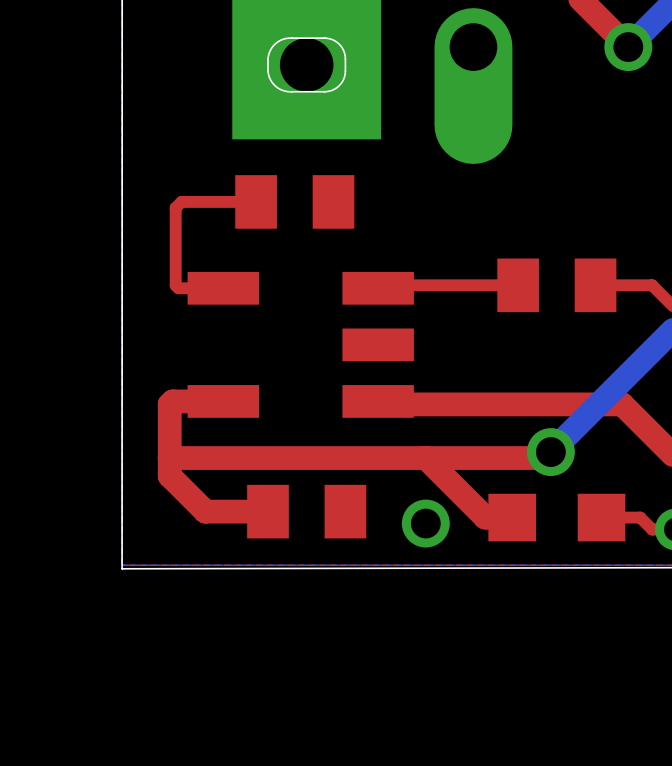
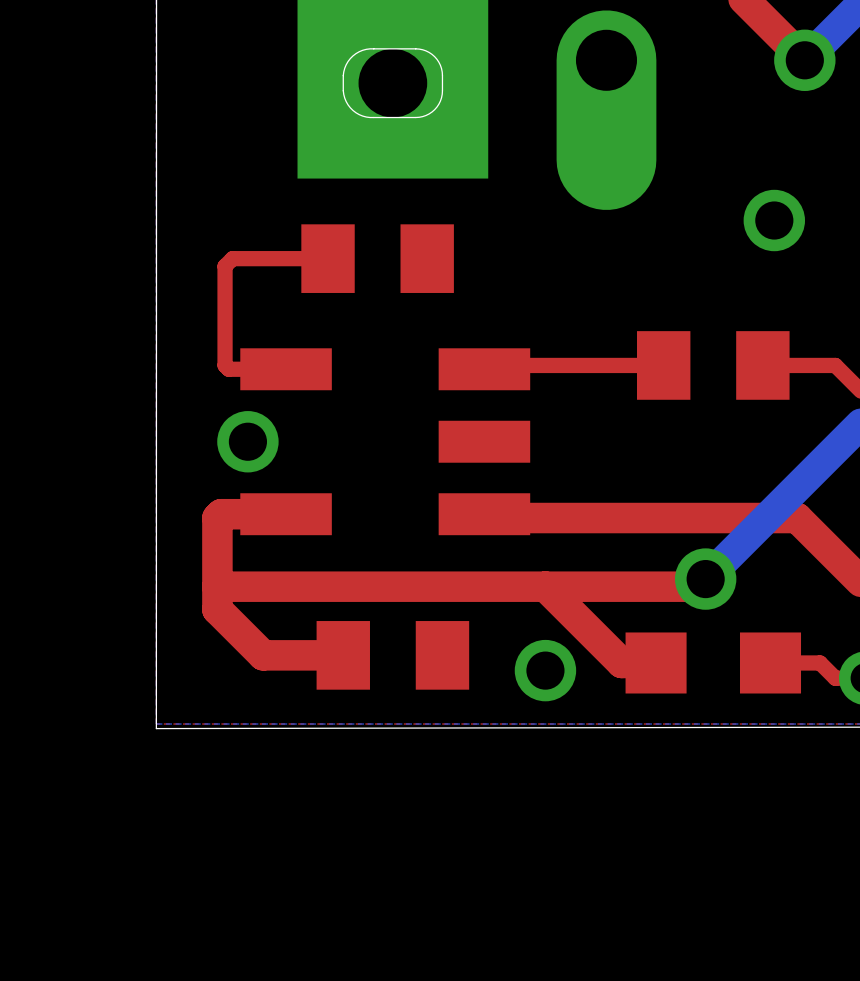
via: none -> (774, 220)
via: none -> (247, 441)

